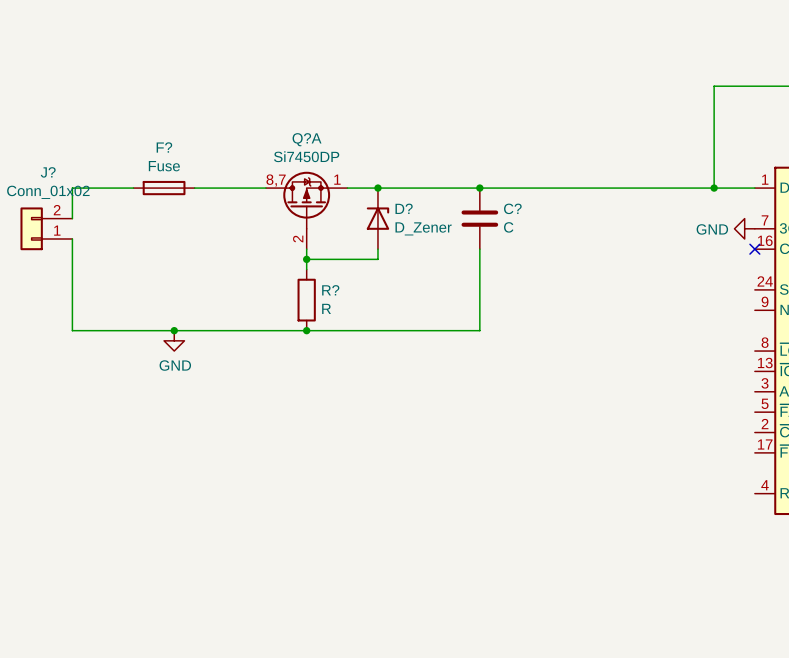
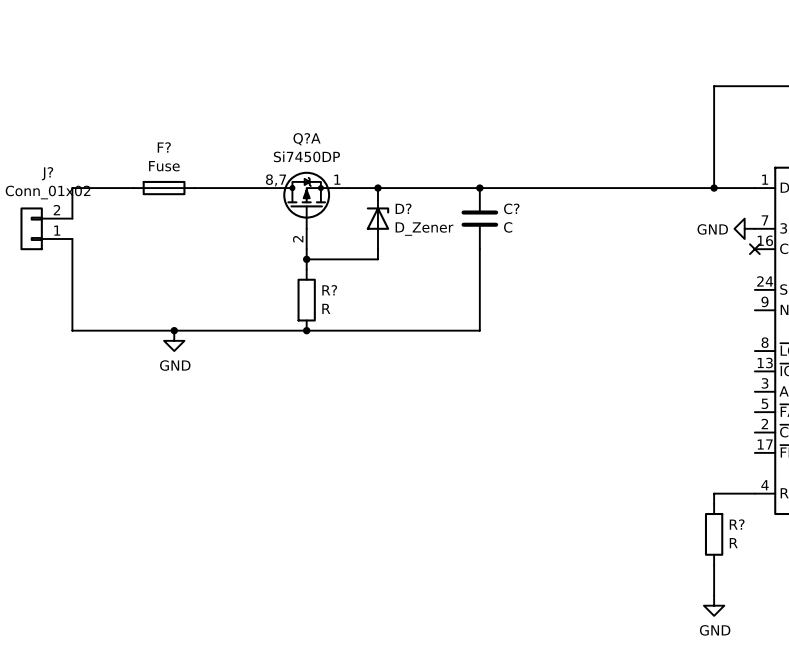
wire: none -> (754, 493) (714, 493) (714, 503)
R?: none -> R (714, 534)
wire: none -> (714, 564) (714, 595)
power symbol: none -> GND (714, 605)

